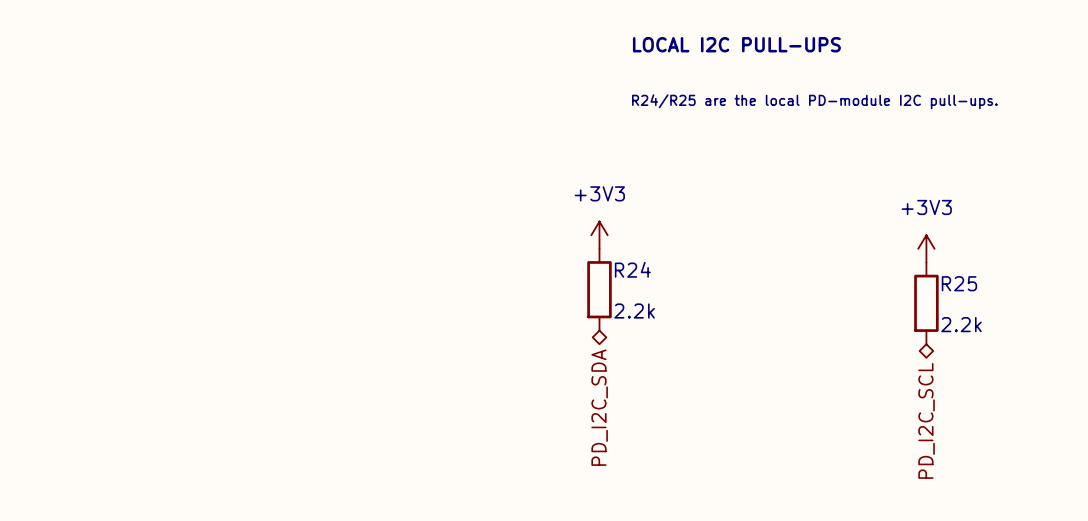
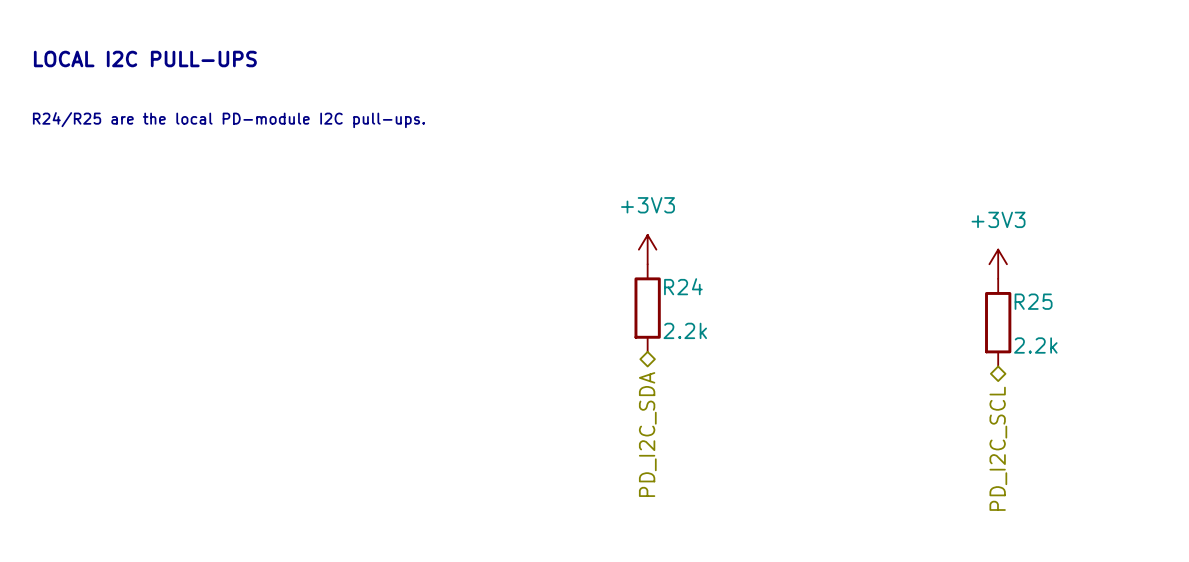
text: LOCAL I2C PULL-UPS (736, 44) -> none
text: none -> LOCAL I2C PULL-UPS (145, 58)
text: R24/R25 are the local PD-module I2C pull-ups. (814, 101) -> none
text: none -> R24/R25 are the local PD-module I2C pull-ups. (228, 120)

